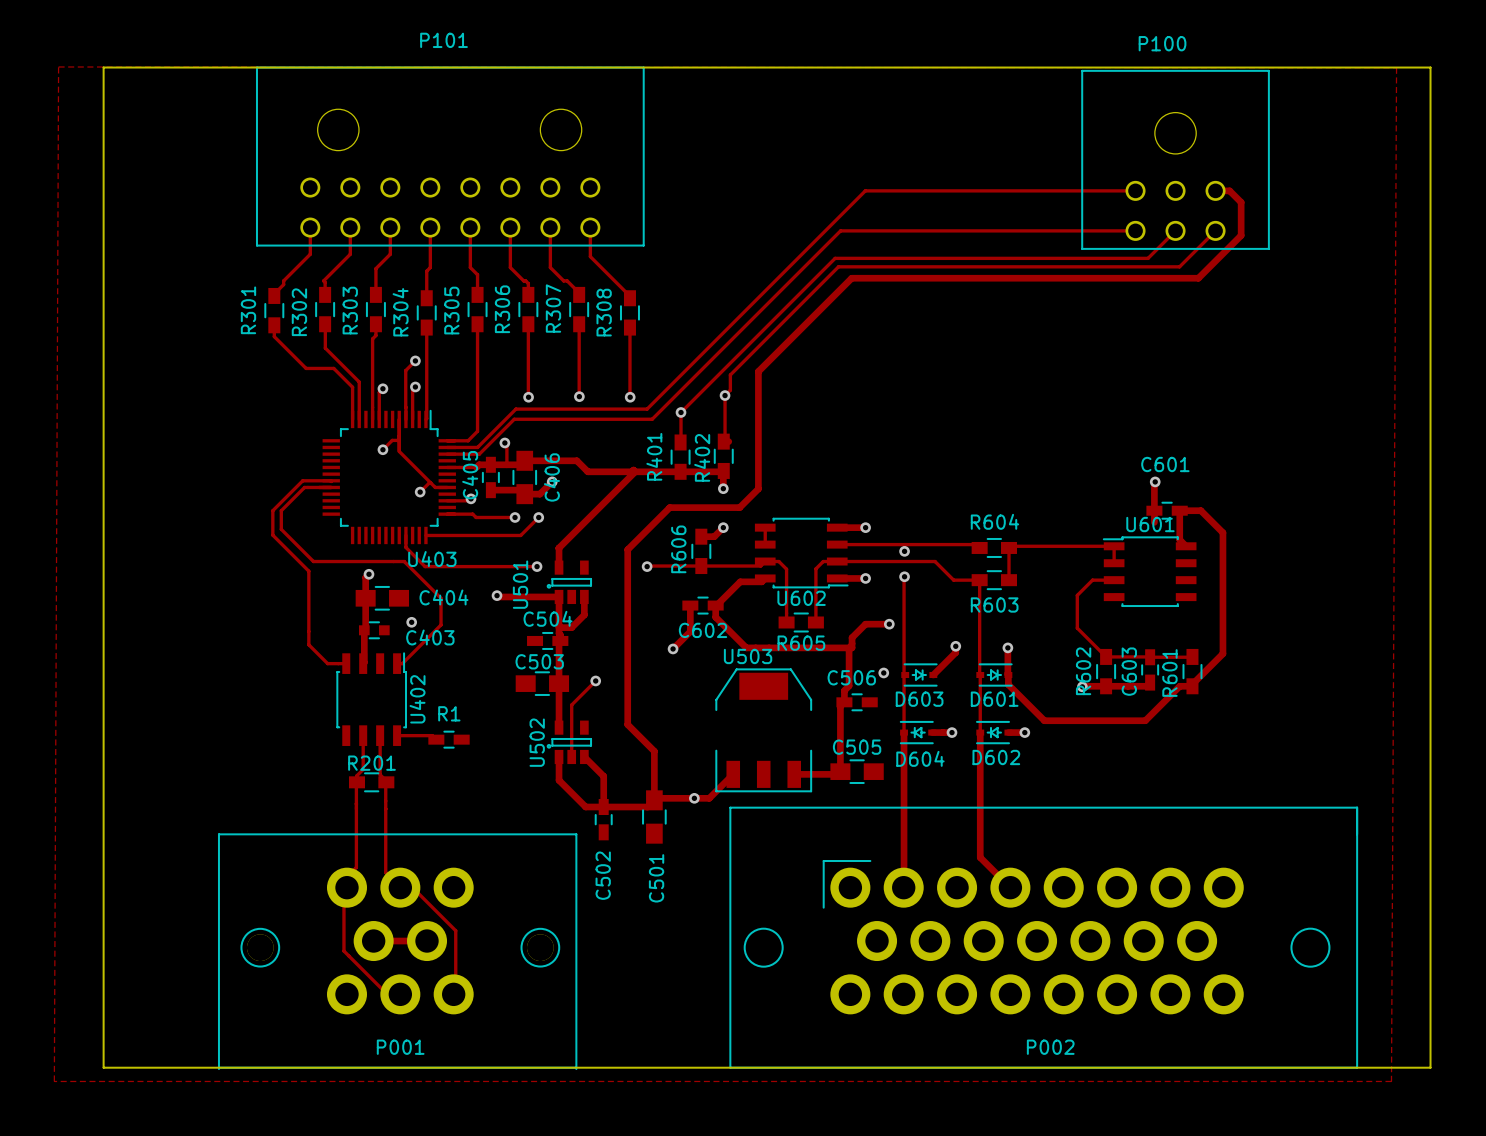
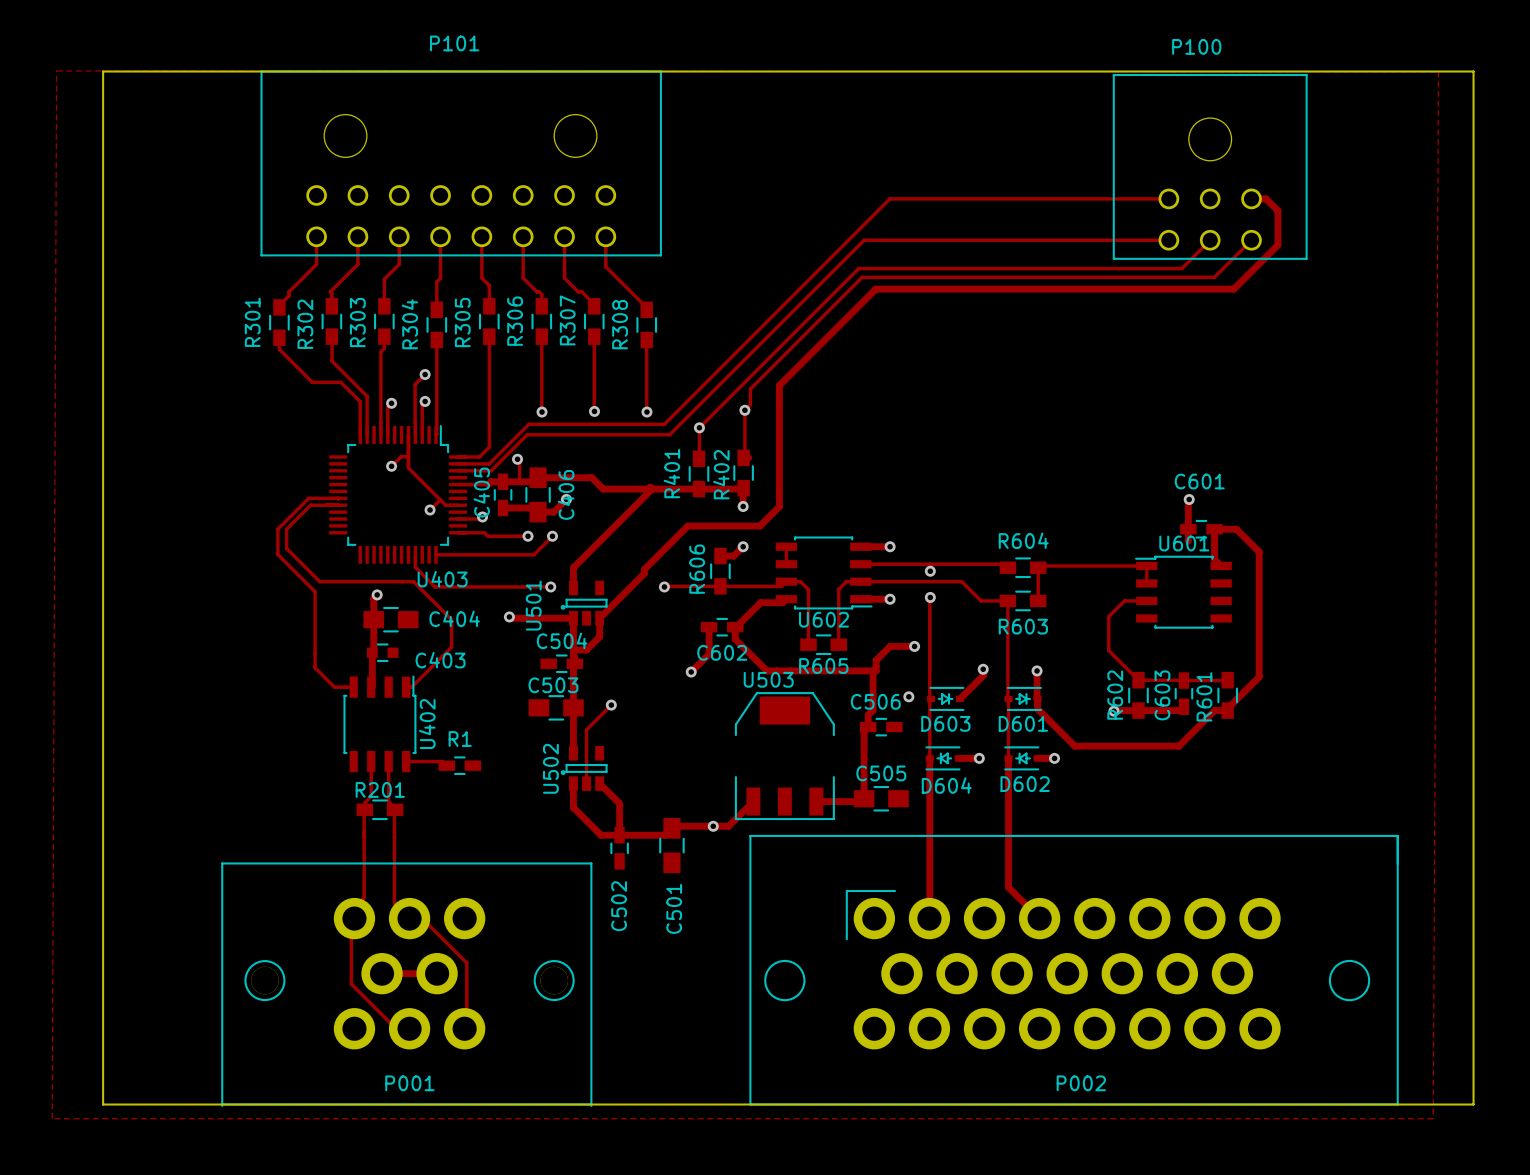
track: (627, 553) (627, 724) (654, 751) (654, 800) -> (644, 573) (599, 618)
via: (411, 622) -> none

